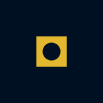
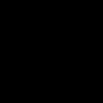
part: (51, 51) -> none

